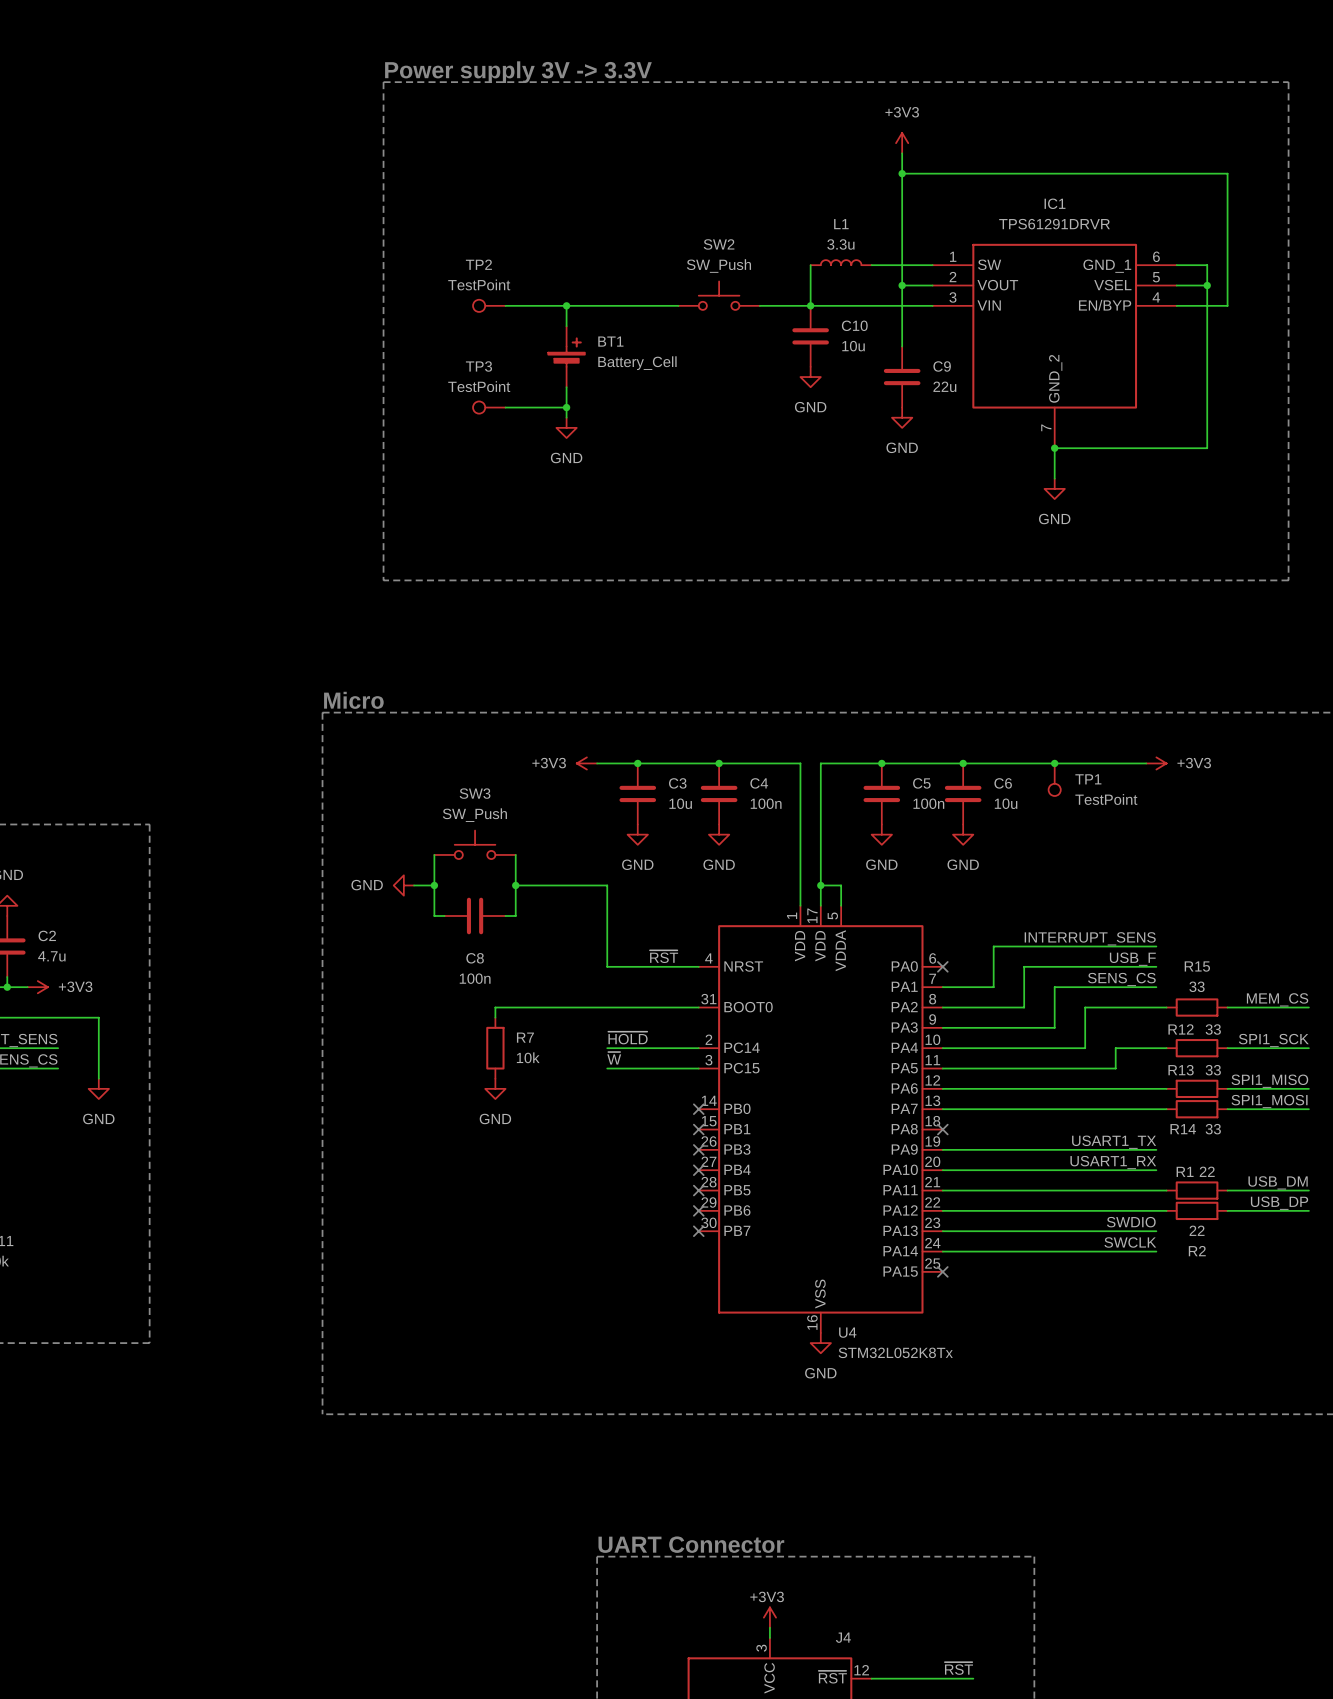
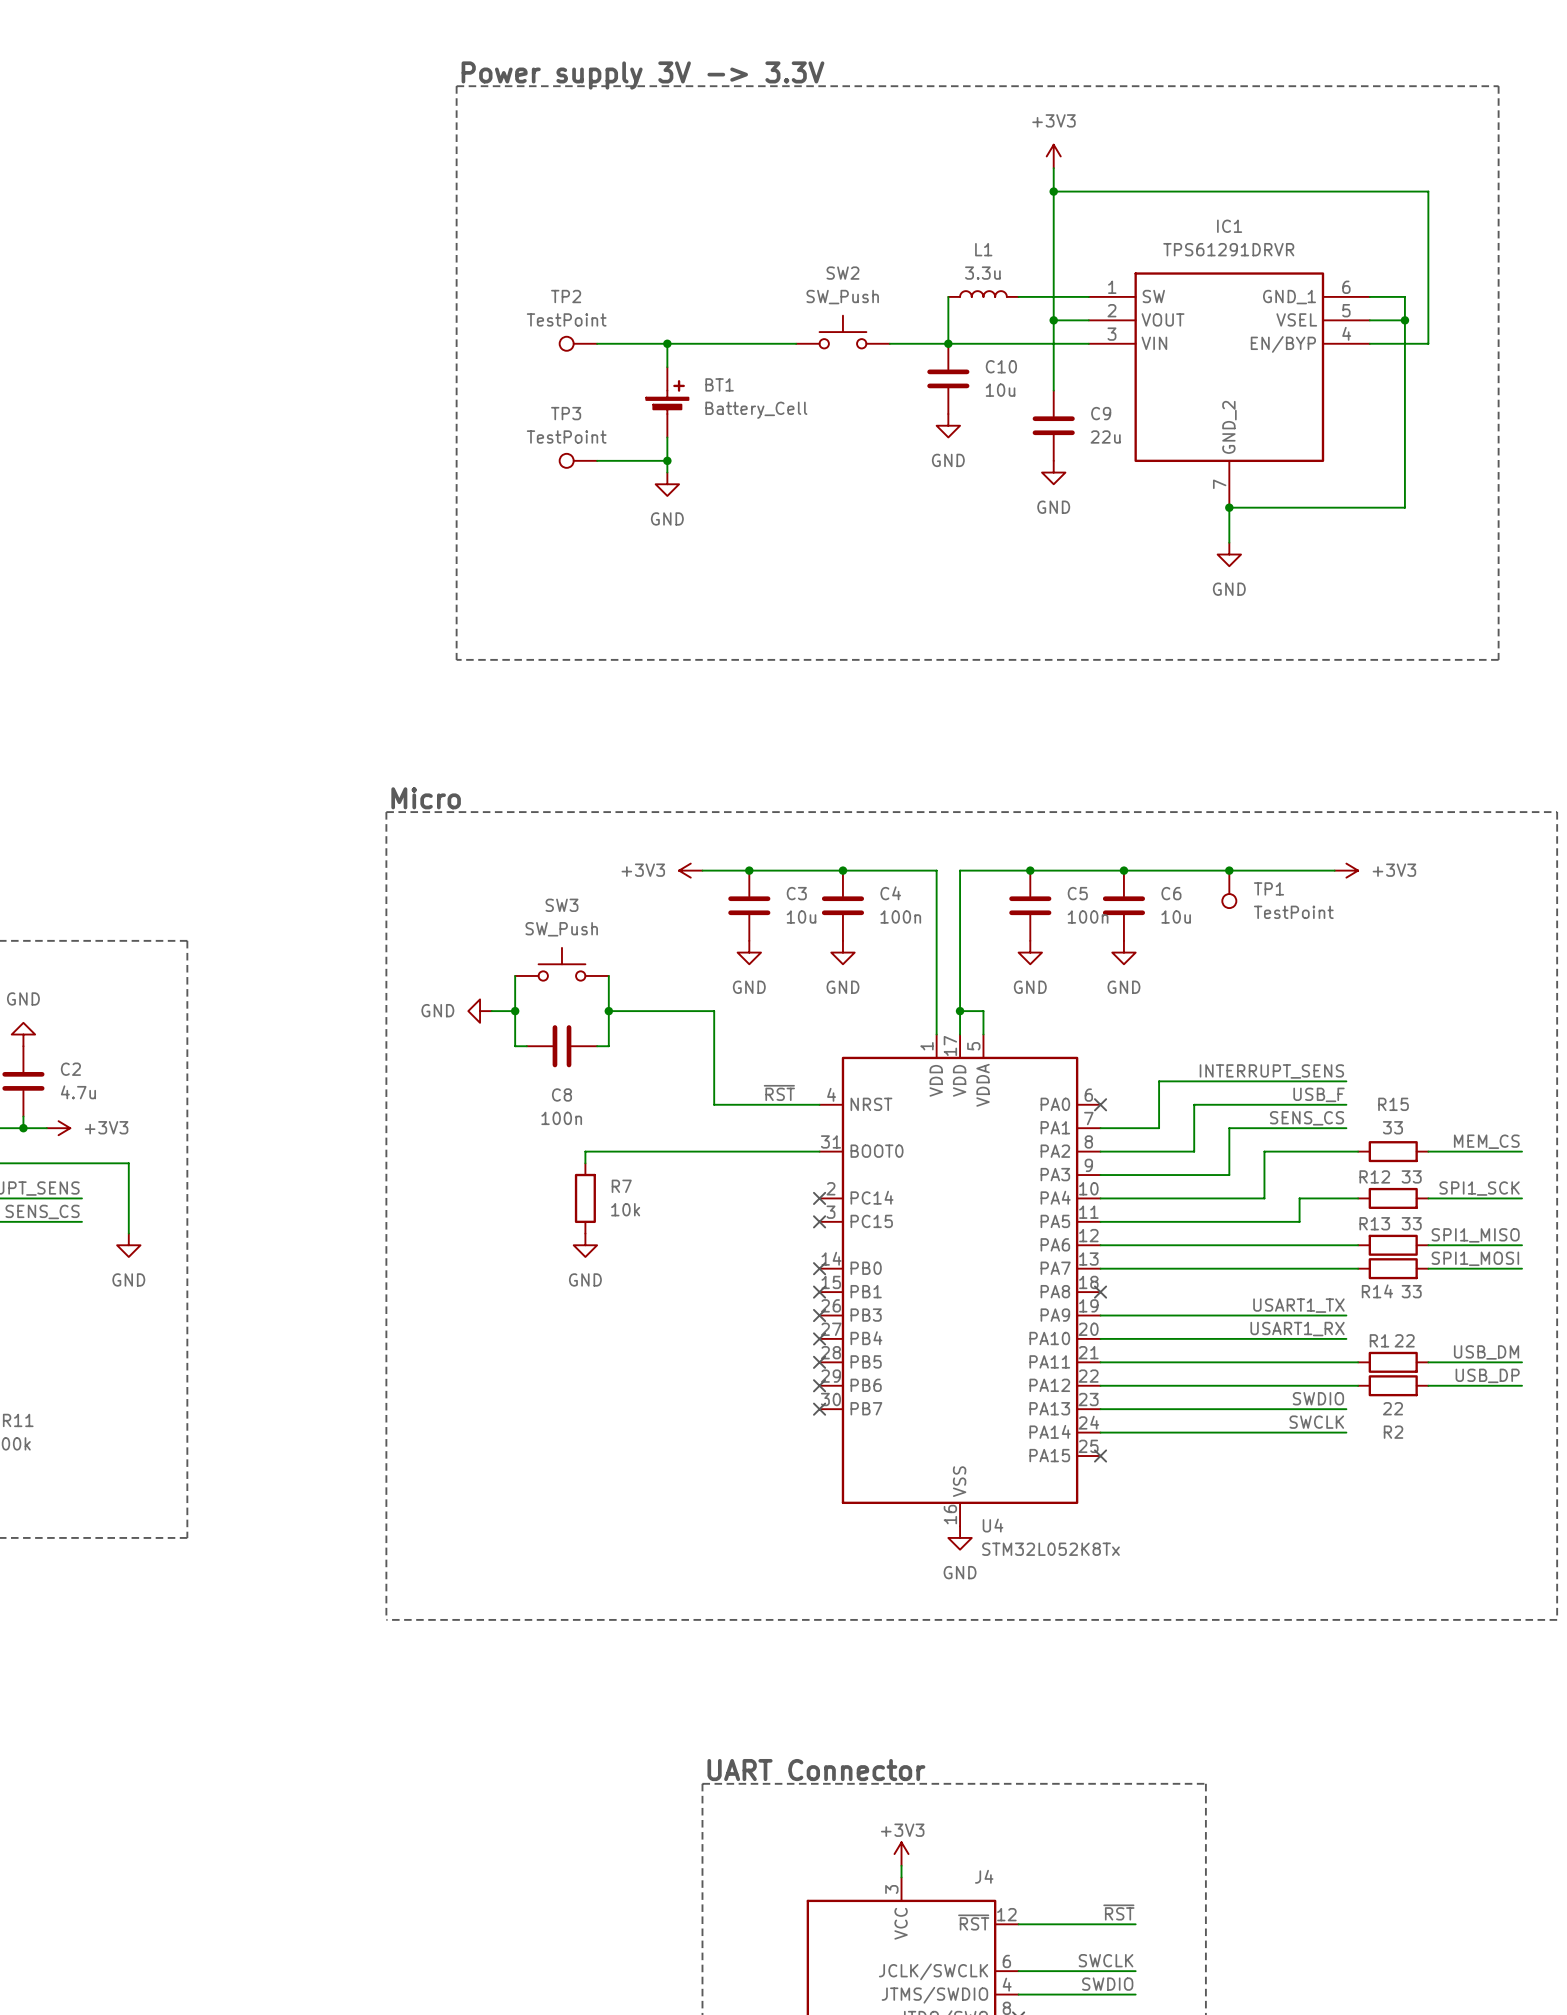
label: ~{HOLD} (627, 1038) -> none
wire: (607, 1048) (698, 1048) -> none
no-connect mark: none -> (819, 1198)
label: ~{W} (614, 1058) -> none
wire: (607, 1068) (698, 1068) -> none
no-connect mark: none -> (819, 1221)

